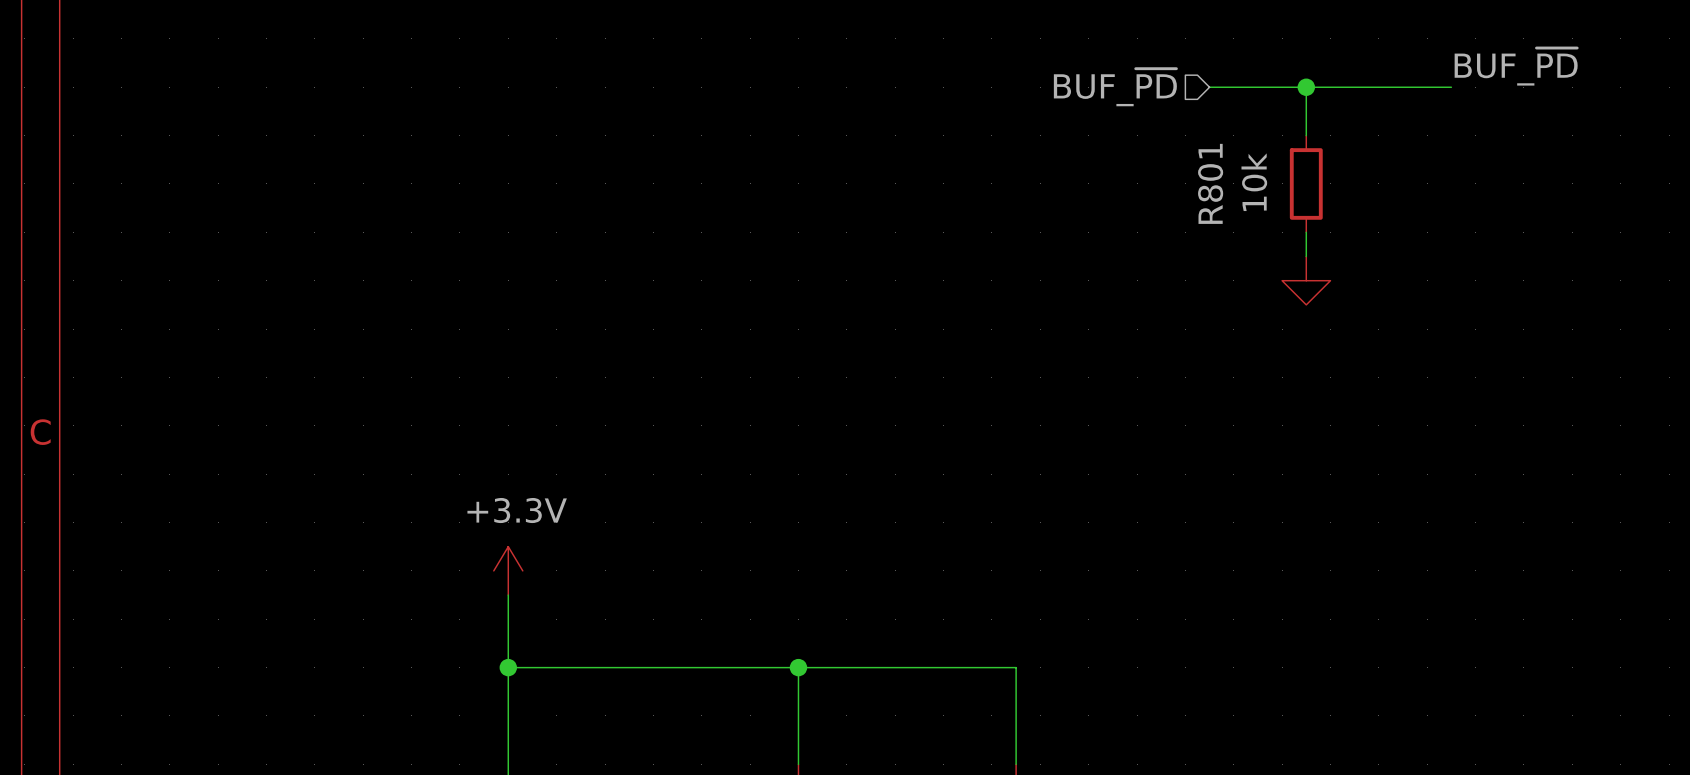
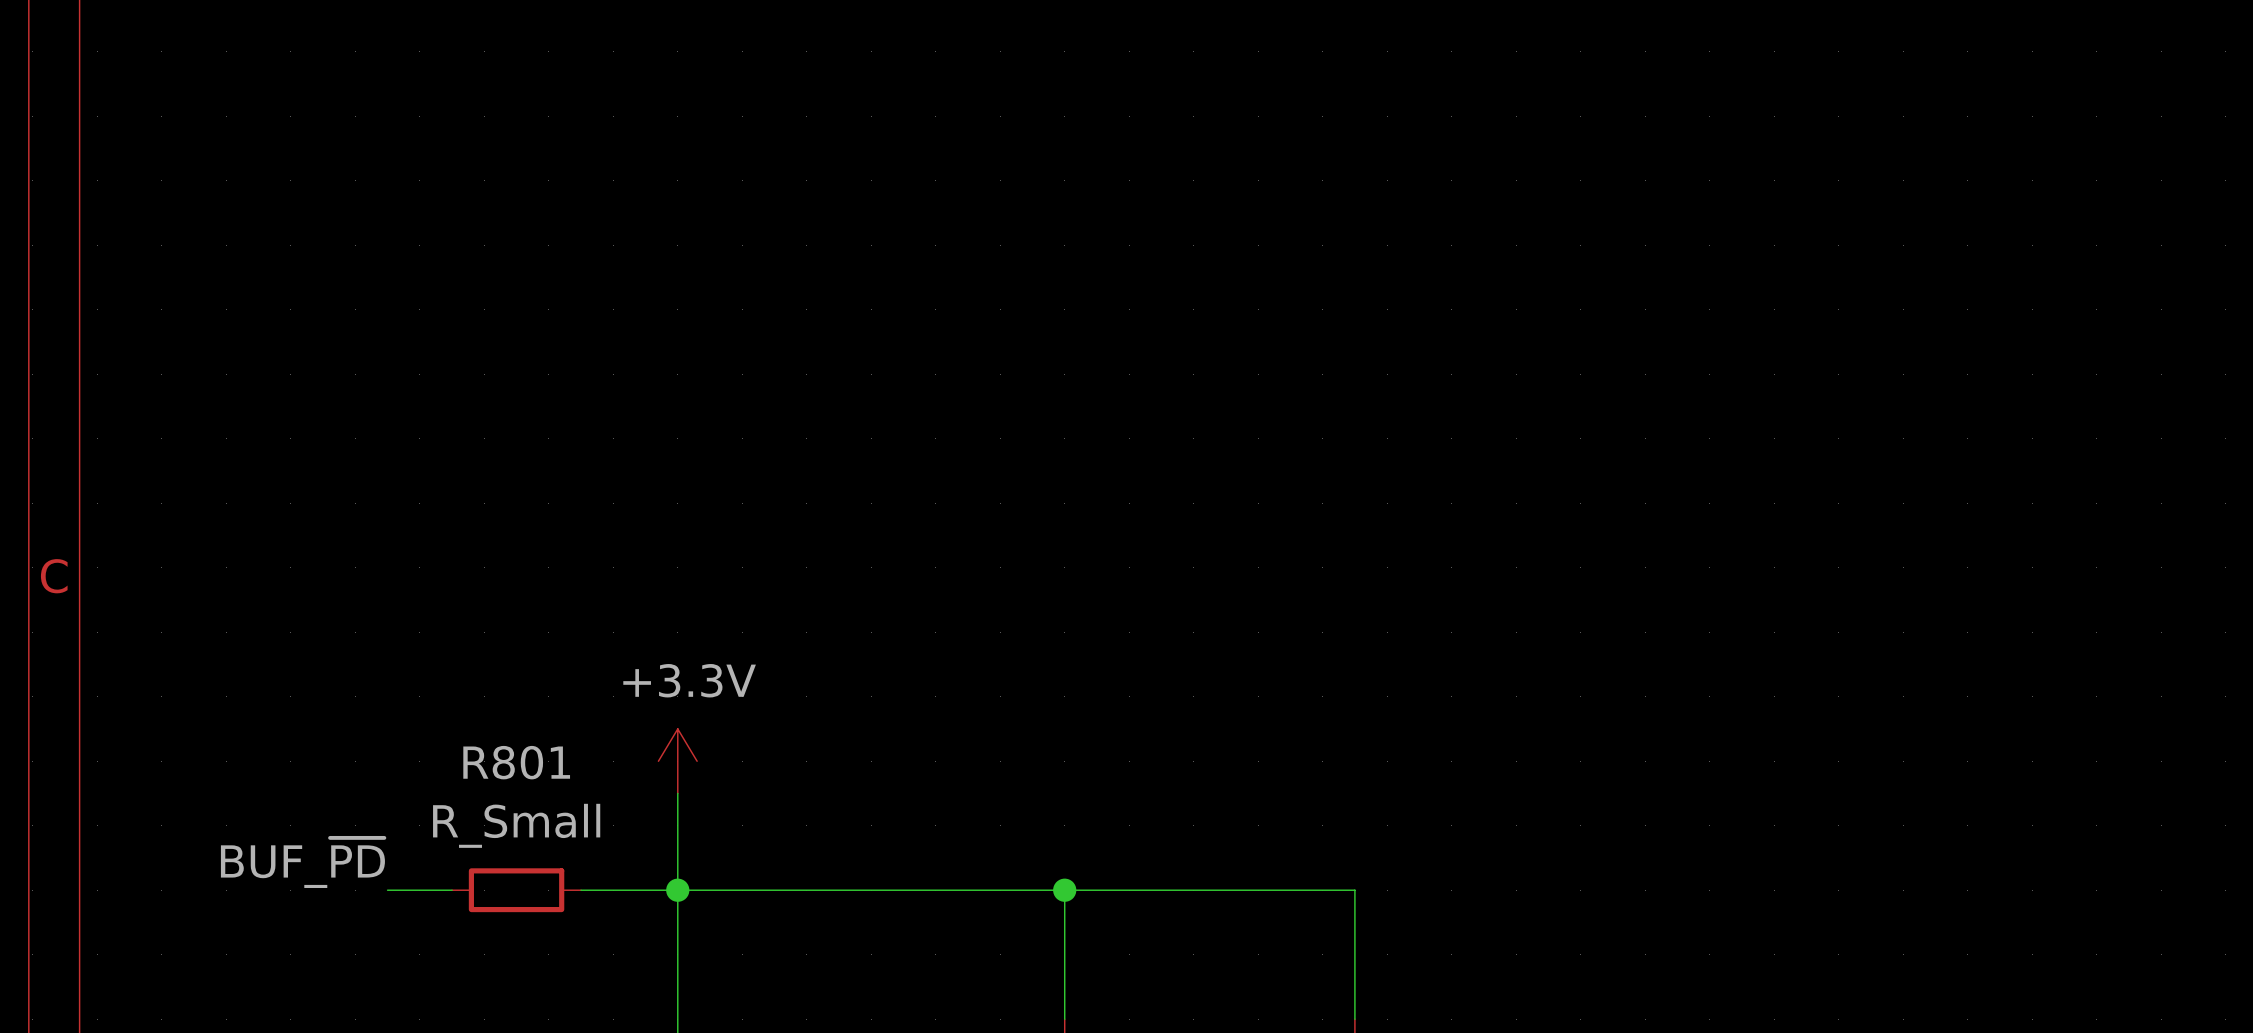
label: BUF_~{PD} (1516, 66) -> none
hierarchical label: BUF_~{PD} (1115, 87) -> none
wire: (1209, 87) (1451, 87) -> none
wire: (1306, 87) (1306, 135) -> none
junction: (1306, 87) -> none
R801 value: 10k (1254, 182) -> R_Small (516, 825)
R801 rotation: 0° (1306, 183) -> 90° clockwise (516, 890)
R801 position: (1306, 183) -> (516, 890)
wire: (1306, 232) (1306, 256) -> none
power symbol: (1306, 280) -> none
label: none -> BUF_~{PD} (302, 862)
wire: none -> (387, 890) (452, 890)
wire: none -> (581, 890) (677, 890)

